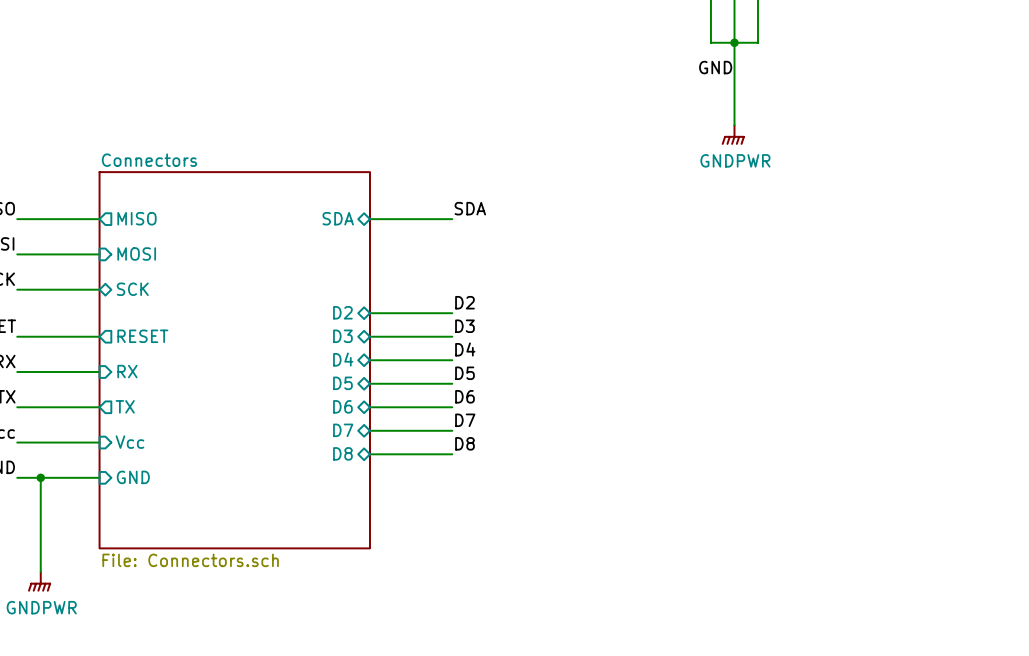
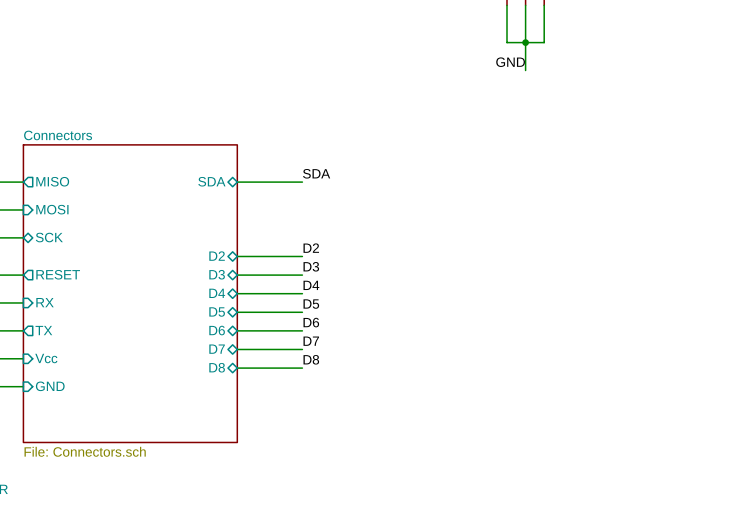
wire: (734, 78) (734, 125) -> none
power symbol: GNDPWR (733, 134) -> none

